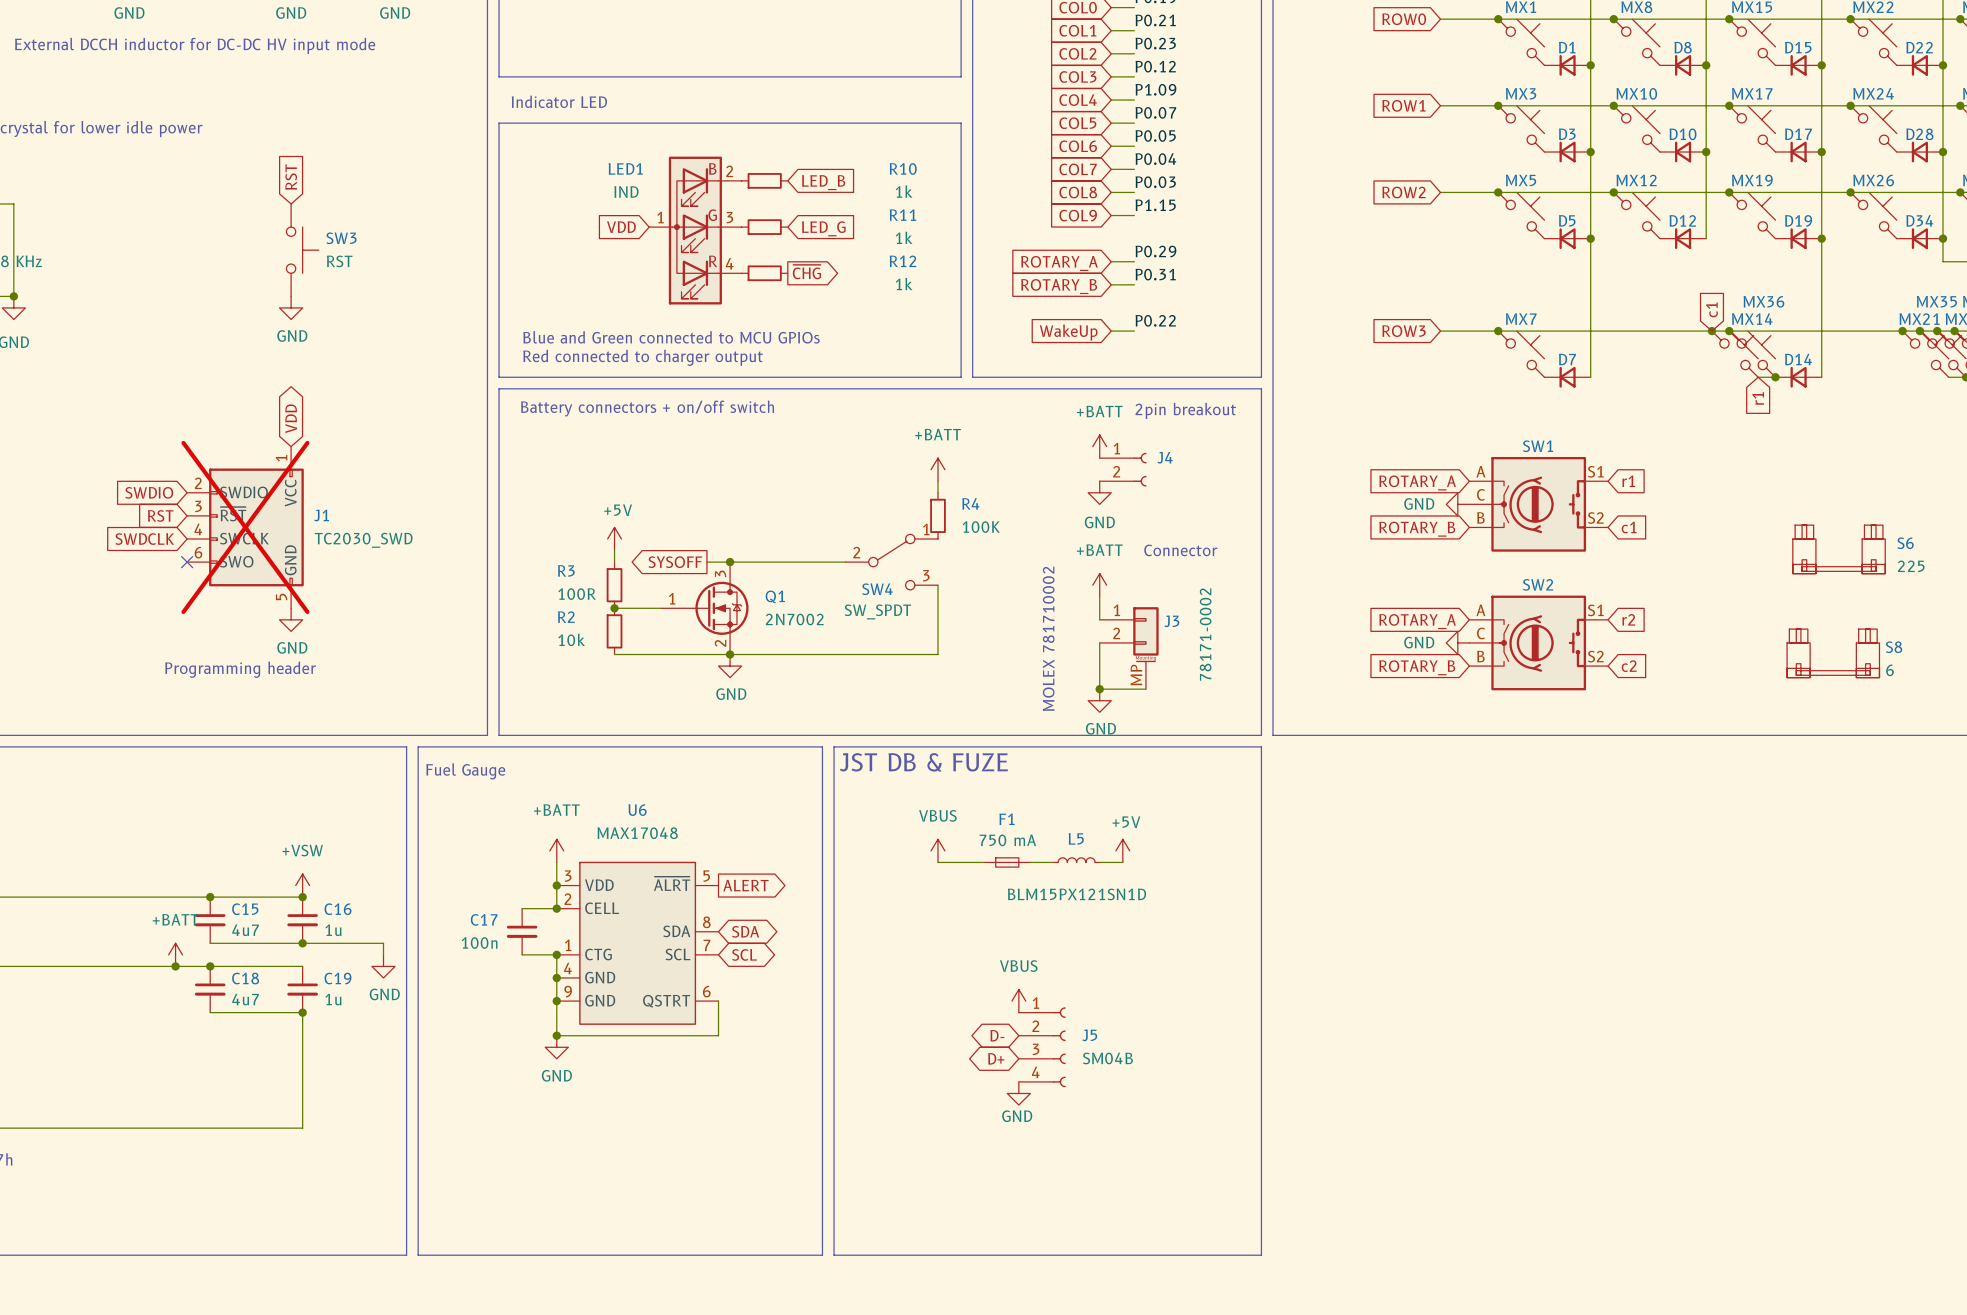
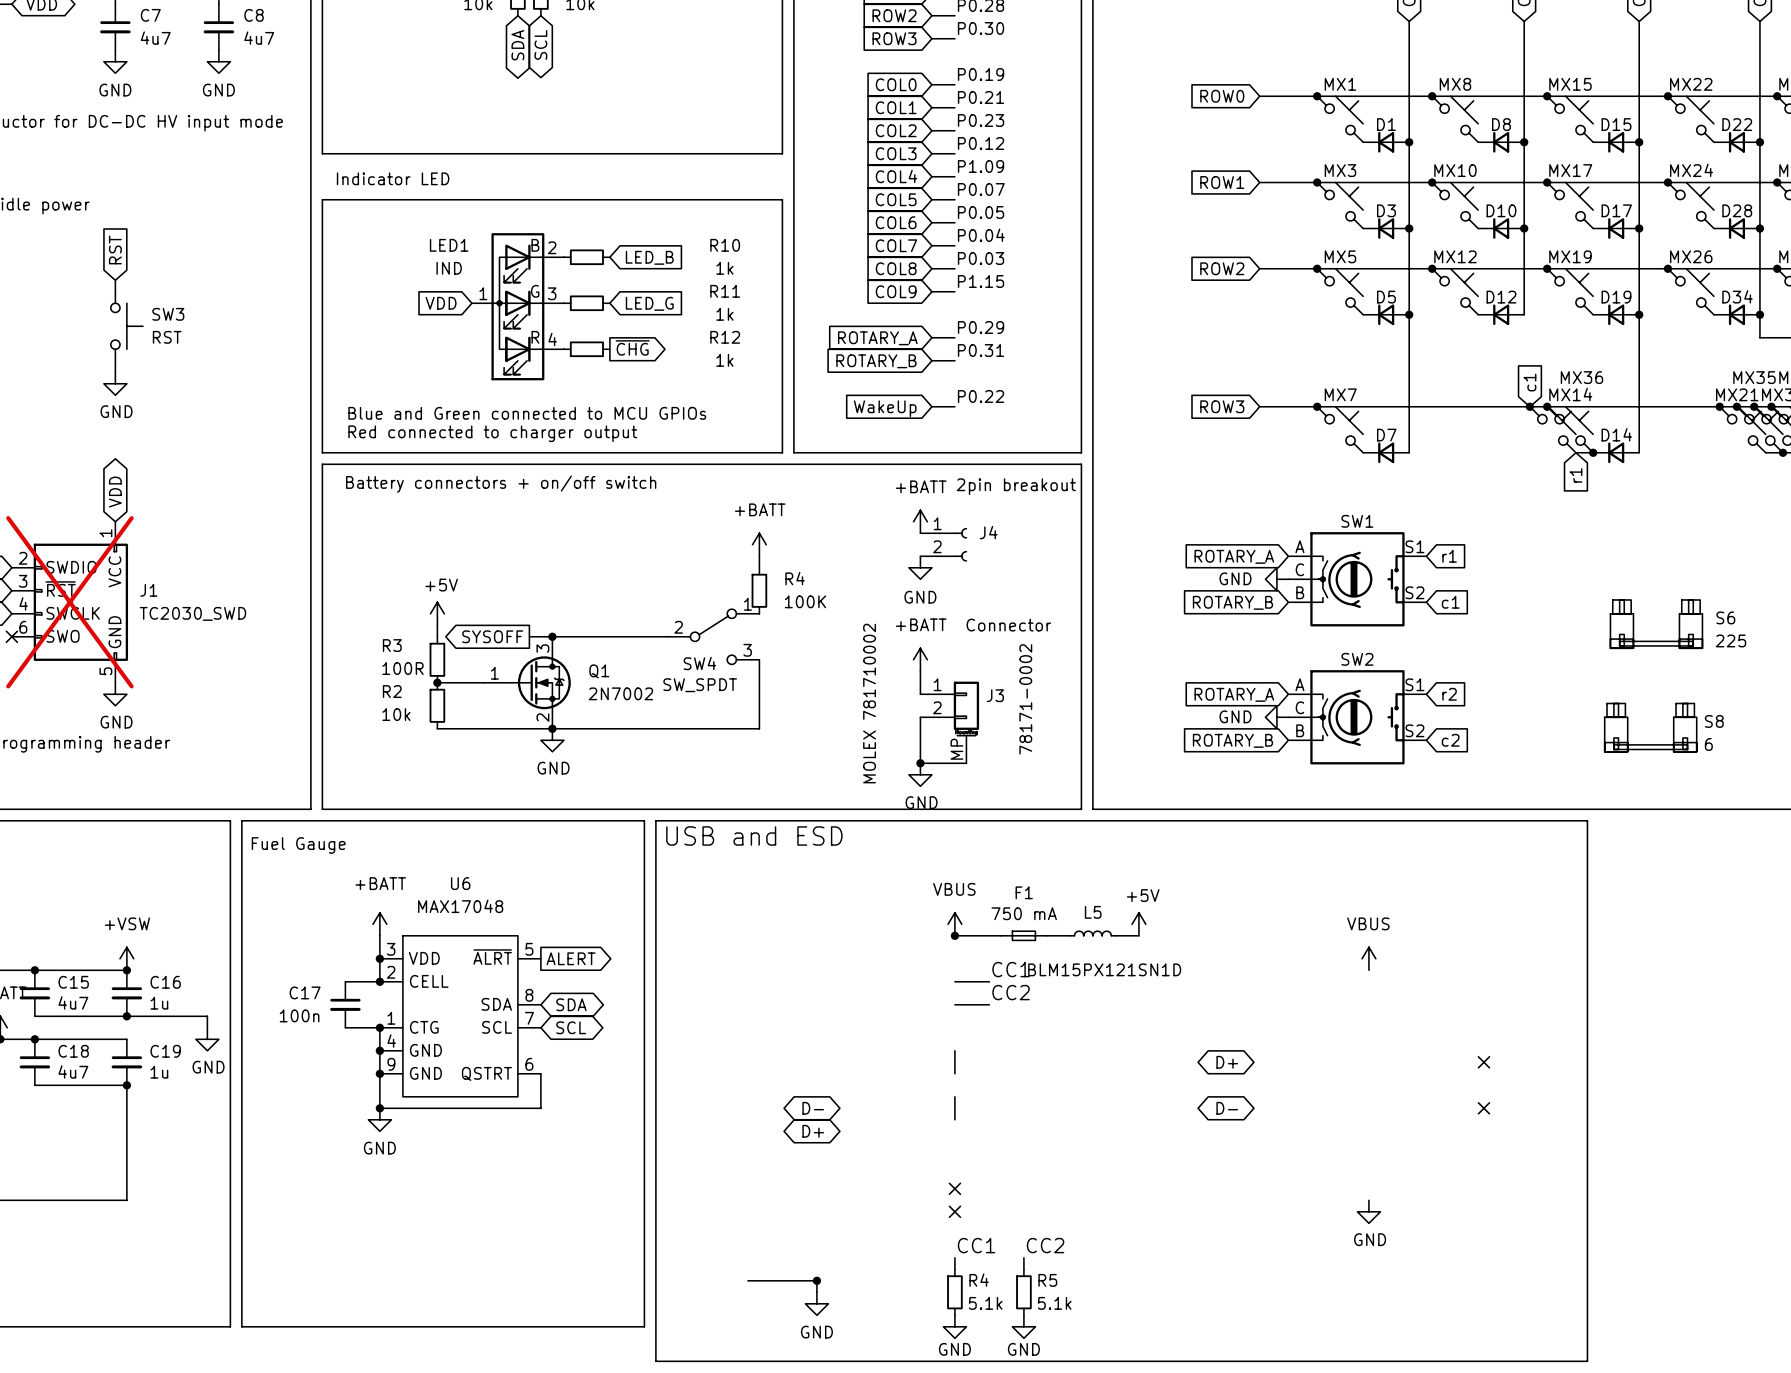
line: (1261, 746) (1261, 1255) (834, 1255) -> (1081, 820) (1587, 820) (1587, 1361) (655, 1361) (655, 1326)
text: JST DB & FUZE (923, 762) -> USB and ESD (754, 836)
power symbol: VBUS (937, 850) -> none
power symbol position: +5V (1122, 850) -> +5V (1138, 924)
power symbol: none -> VBUS (954, 924)
L5 position: (1076, 860) -> (1092, 933)
wire: (937, 862) (984, 862) -> (954, 935) (1000, 935)
F1 position: (1007, 862) -> (1023, 935)
wire: (1030, 862) (1053, 862) -> (1046, 935) (1069, 935)
wire: (1099, 862) (1122, 862) -> (1115, 935) (1138, 935)
junction: none -> (954, 935)
power symbol: none -> VBUS (1368, 958)
L5 value position: BLM15PX121SN1D (1076, 894) -> BLM15PX121SN1D (1104, 969)
label: none -> CC1 (1011, 969)
wire: none -> (954, 981) (989, 981)
label: none -> CC2 (1011, 992)
wire: none -> (954, 1004) (989, 1004)
wire: none -> (954, 1050) (954, 1073)
global label: none -> D+ (1227, 1062)
no-connect mark: none -> (1483, 1062)
power symbol: VBUS (1018, 1001) -> none
wire: none -> (954, 1096) (954, 1119)
global label: none -> D- (1227, 1108)
no-connect mark: none -> (1483, 1108)
J5: SM04B (1042, 1047) -> none
power symbol: GND (1018, 1093) -> none
no-connect mark: none -> (954, 1188)
no-connect mark: none -> (954, 1211)
power symbol: none -> GND (1368, 1211)
label: none -> CC1 (976, 1245)
label: none -> CC2 (1045, 1245)
wire: none -> (954, 1257) (954, 1269)
wire: none -> (1023, 1257) (1023, 1269)
wire: none -> (747, 1280) (816, 1280) (816, 1292)
junction: none -> (816, 1280)
R4: none -> 5.1k (954, 1292)
R5: none -> 5.1k (1023, 1292)
power symbol: none -> GND (816, 1303)
power symbol: none -> GND (954, 1326)
power symbol: none -> GND (1023, 1326)

